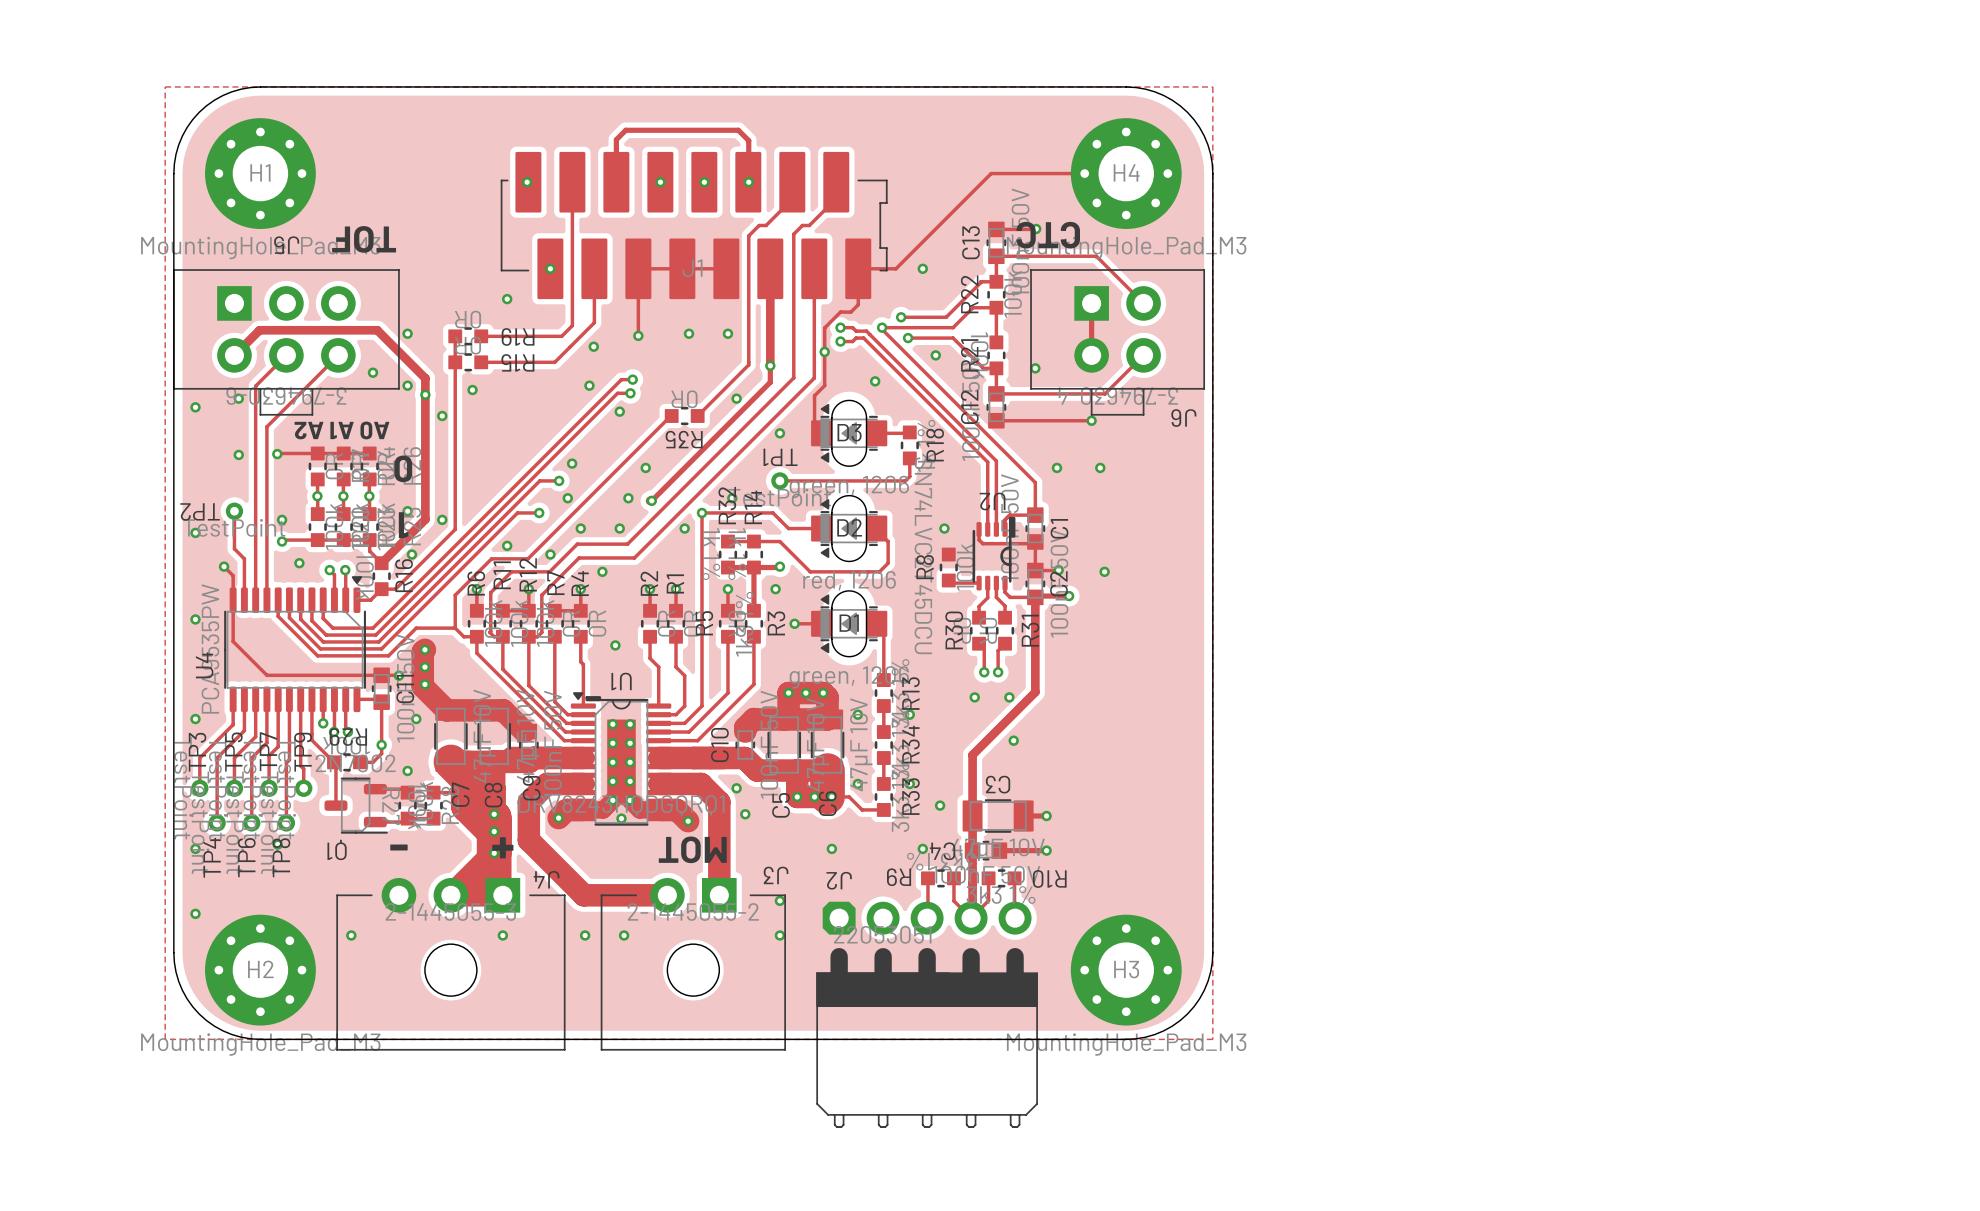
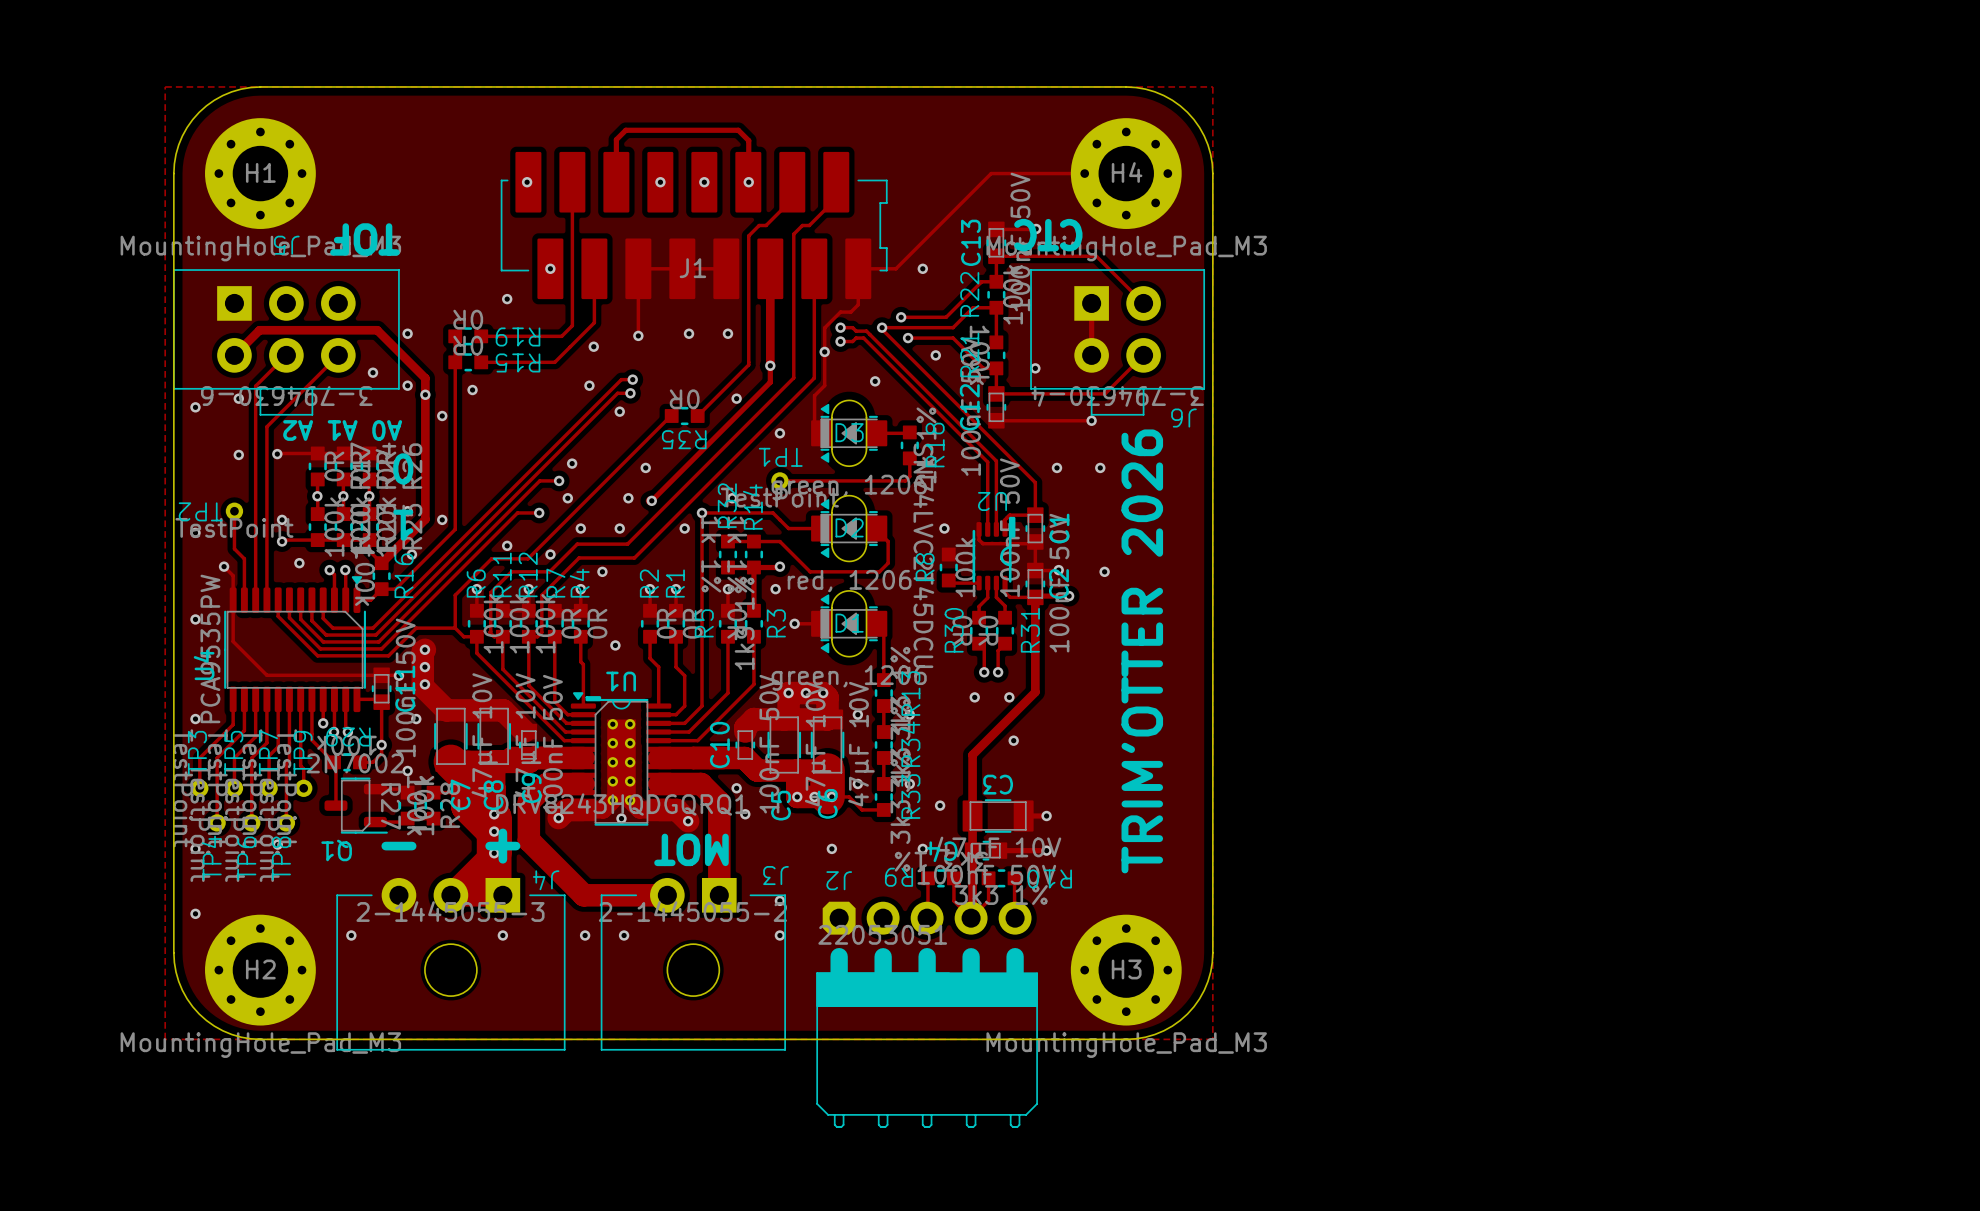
text: none -> TRIM'OTTER 2026 (1142, 651)

